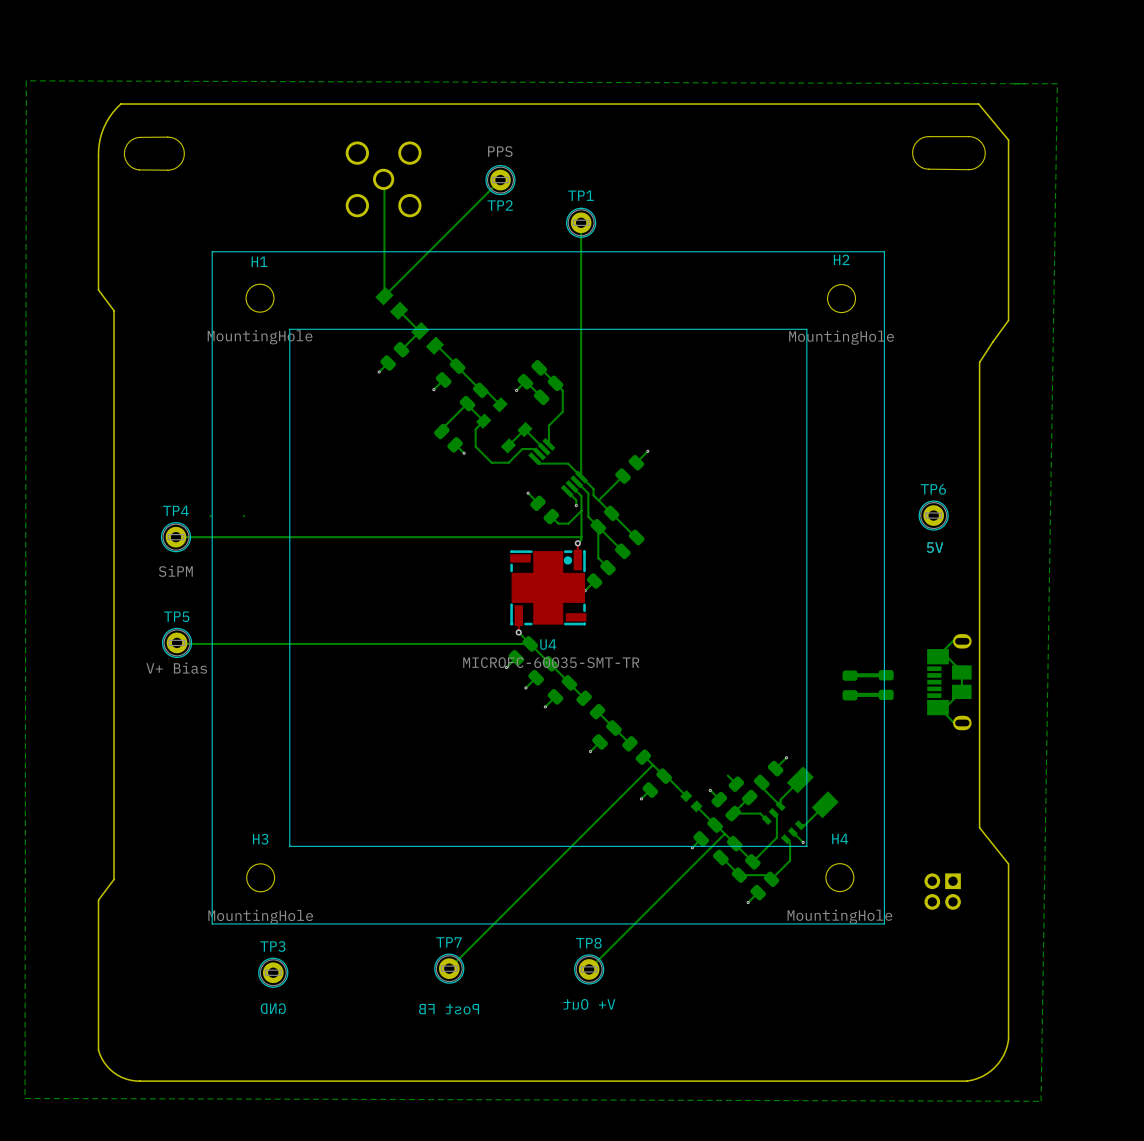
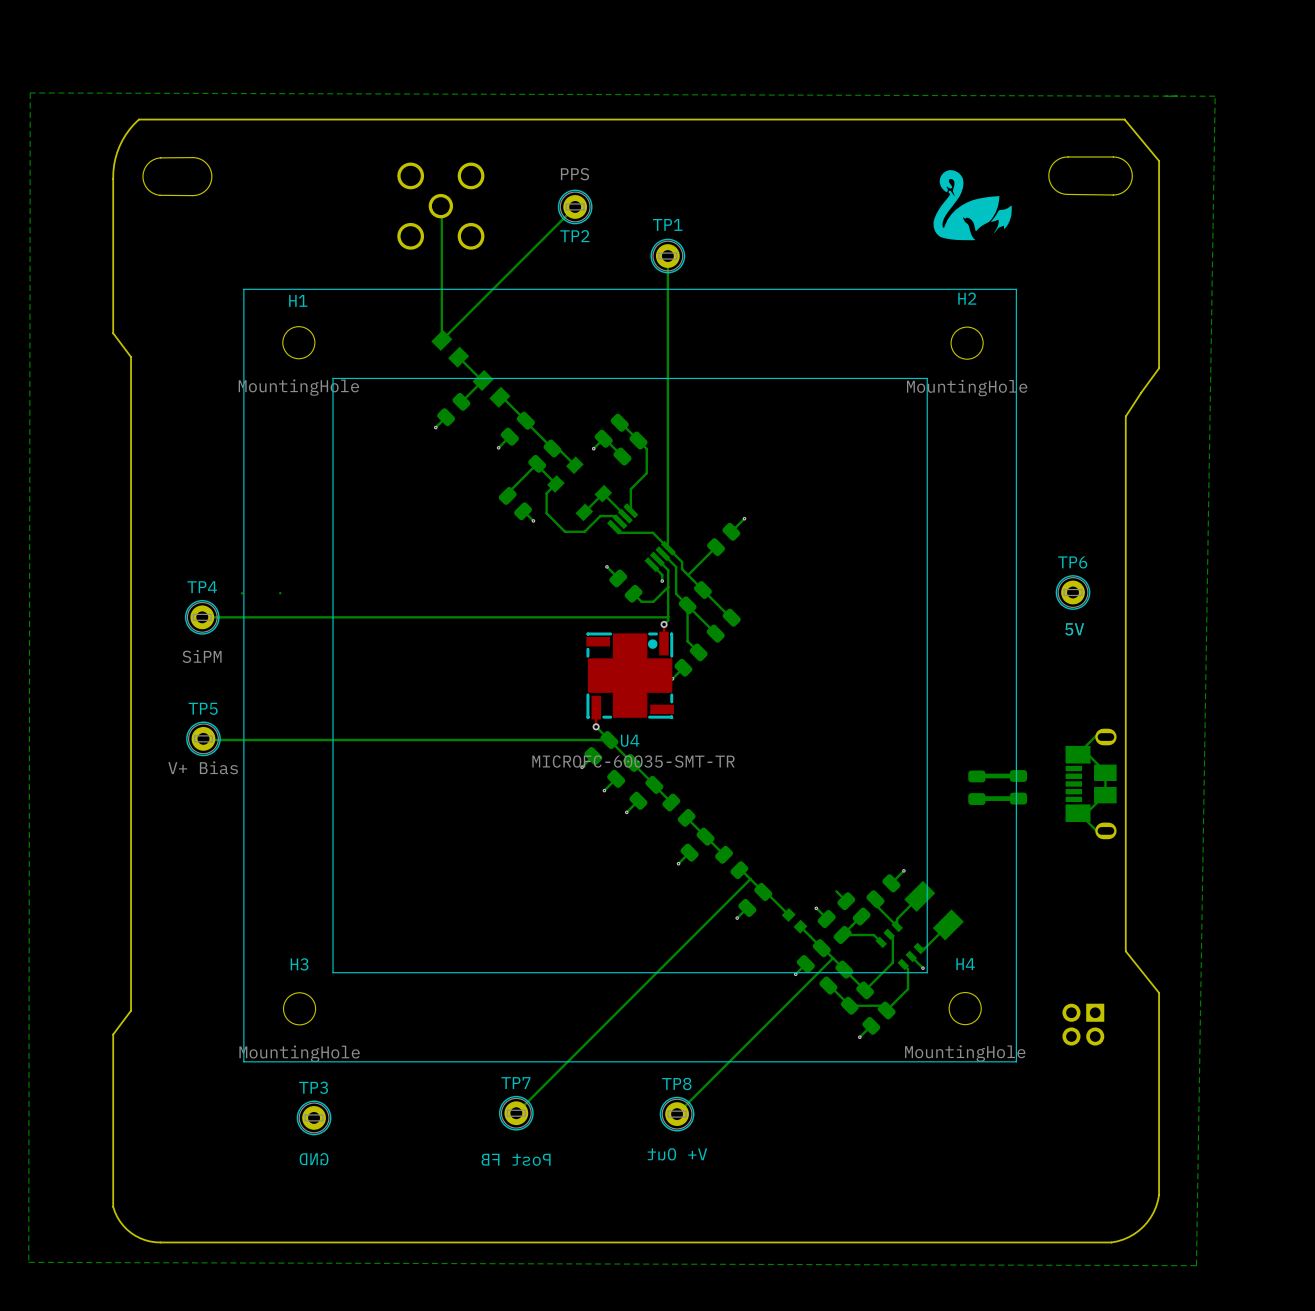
drawing: none -> [933, 170, 1012, 241]

